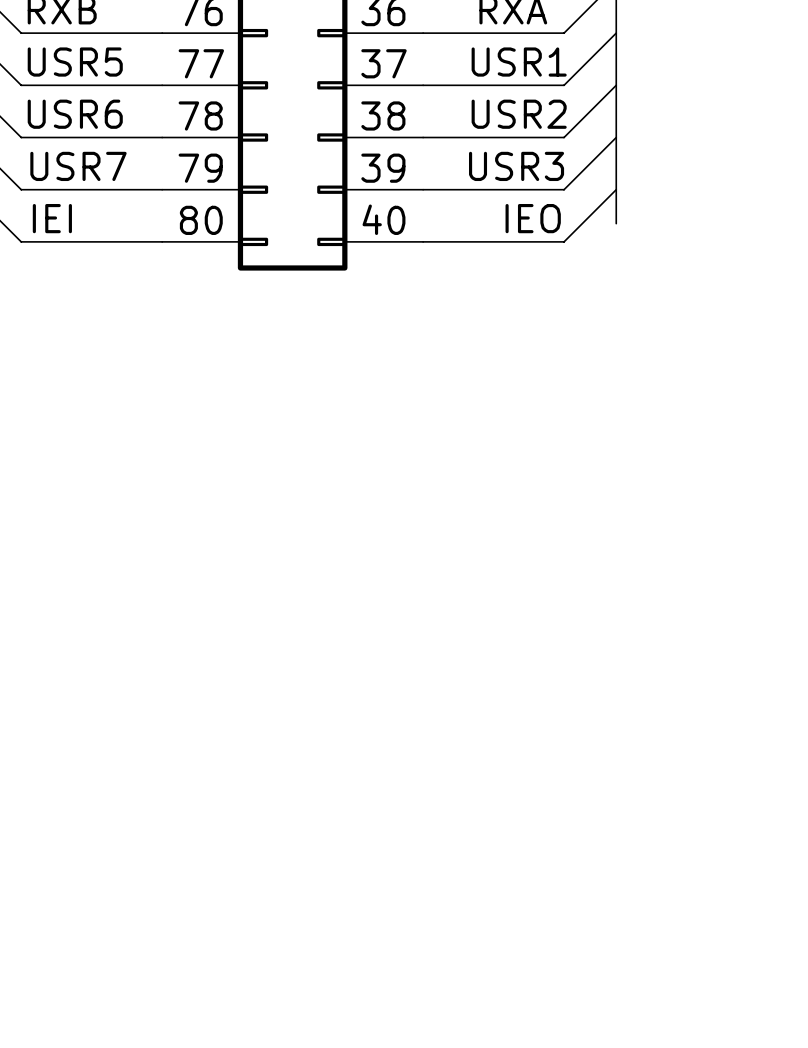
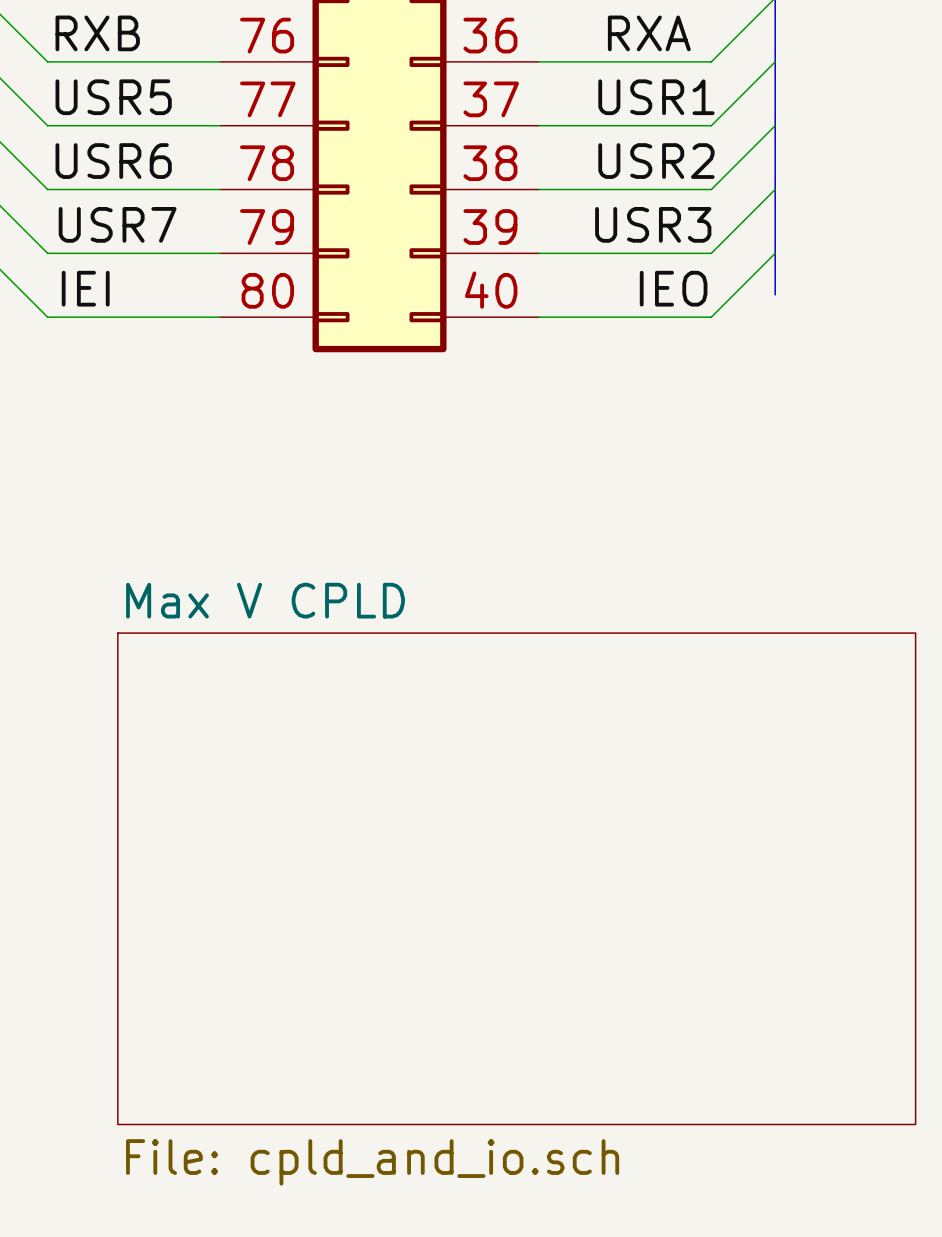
sheet Max V CPLD: none -> File: cpld_and_io.sch (516, 878)

